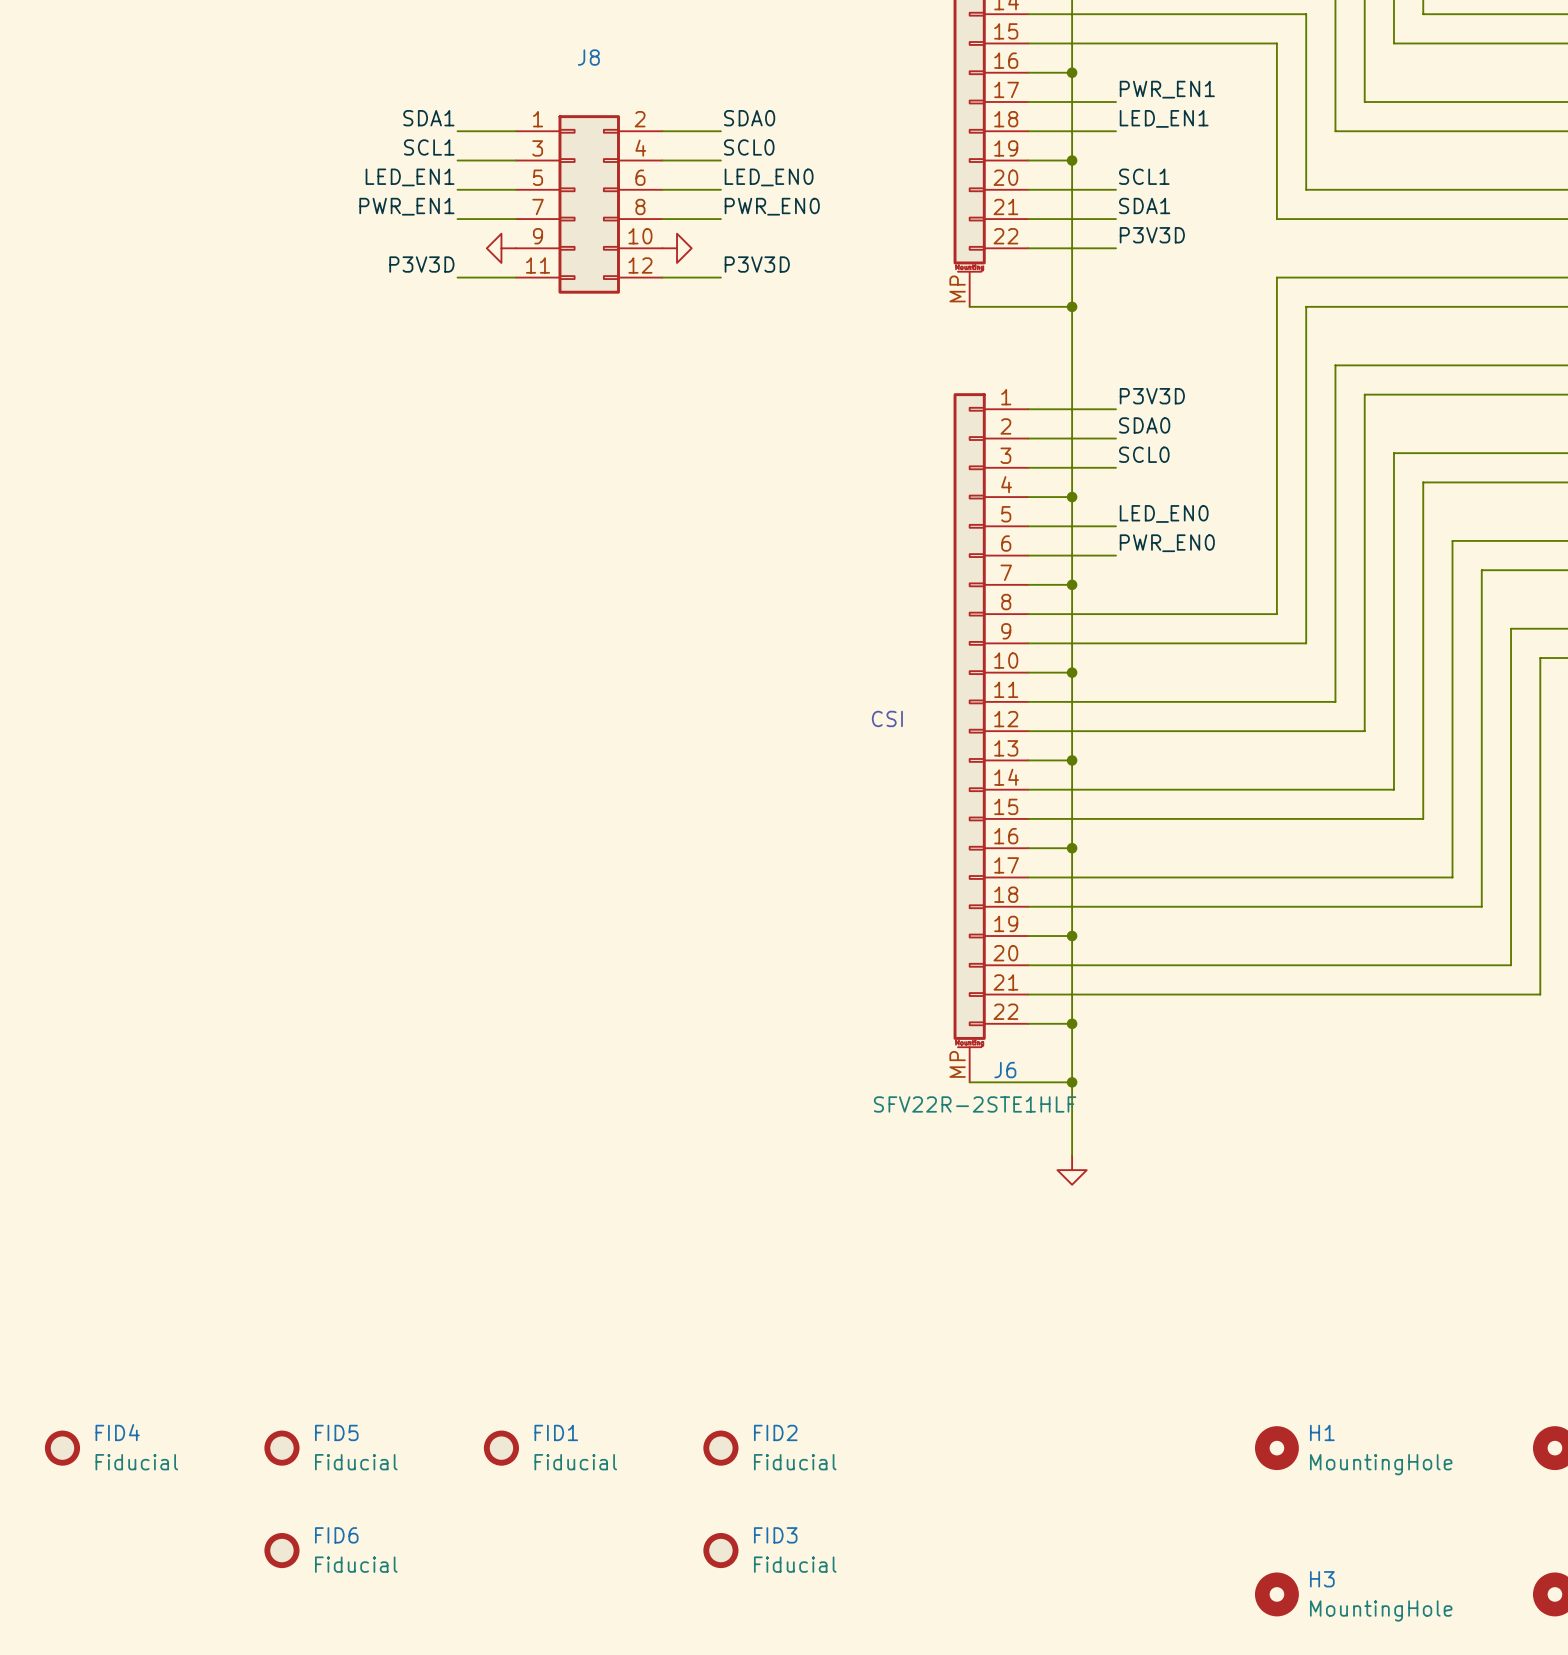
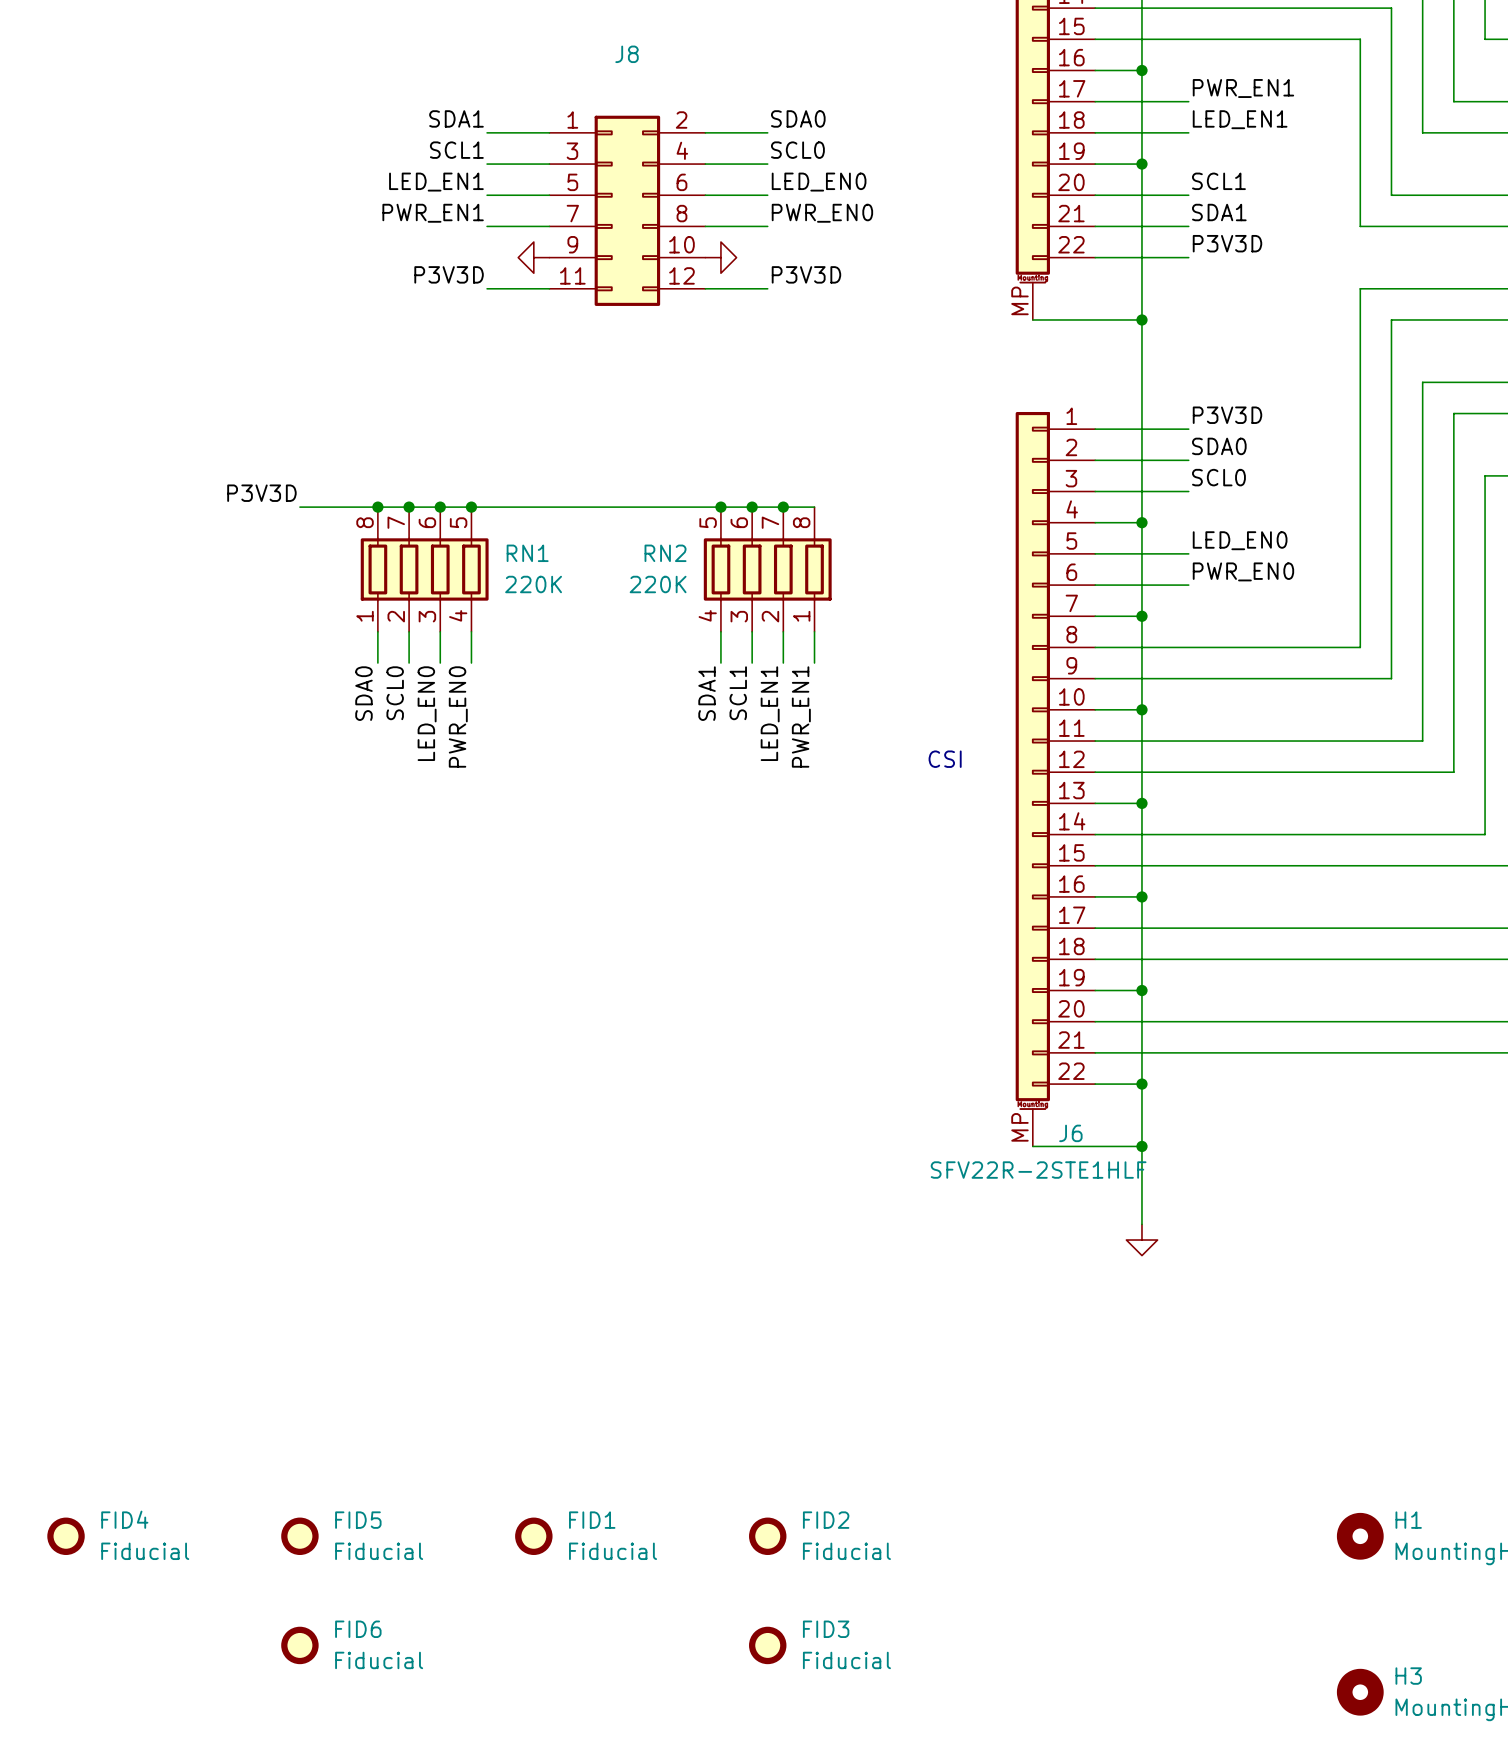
label: none -> P3V3D (261, 493)
wire: none -> (299, 507) (814, 507)
junction: none -> (377, 507)
junction: none -> (409, 507)
junction: none -> (440, 507)
junction: none -> (471, 507)
junction: none -> (720, 507)
junction: none -> (752, 507)
junction: none -> (783, 507)
RN1: none -> 220K (424, 569)
RN2: none -> 220K (767, 569)
wire: none -> (377, 631) (377, 663)
wire: none -> (409, 631) (409, 663)
wire: none -> (440, 631) (440, 663)
wire: none -> (471, 631) (471, 663)
wire: none -> (720, 631) (720, 663)
wire: none -> (752, 631) (752, 663)
wire: none -> (783, 631) (783, 663)
wire: none -> (814, 631) (814, 663)
label: none -> SDA0 (363, 693)
label: none -> SCL0 (395, 693)
label: none -> SDA1 (707, 693)
label: none -> SCL1 (738, 693)
label: none -> LED_EN0 (427, 713)
label: none -> LED_EN1 (770, 713)
label: none -> PWR_EN0 (458, 717)
label: none -> PWR_EN1 (801, 717)

